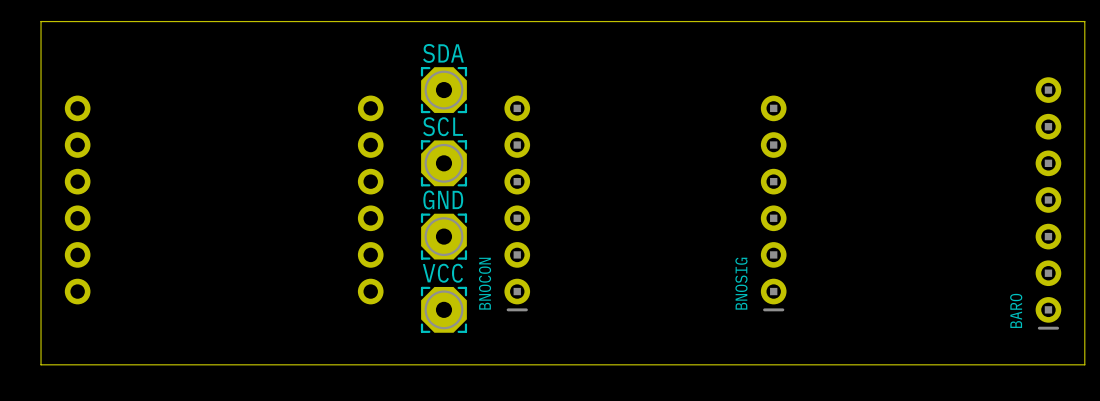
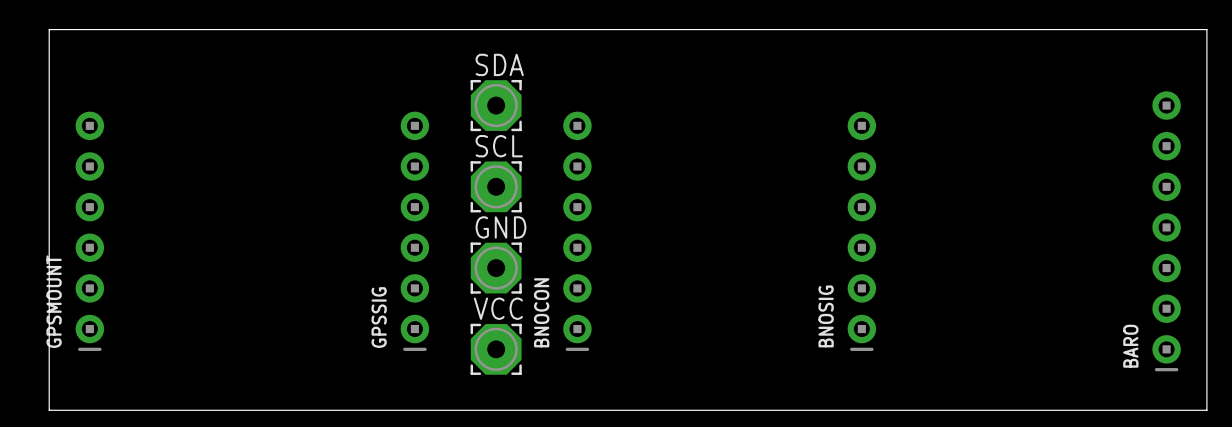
GPSSIG side: bottom (77, 199) -> top (414, 231)
GPSMOUNT side: bottom (370, 199) -> top (89, 231)

